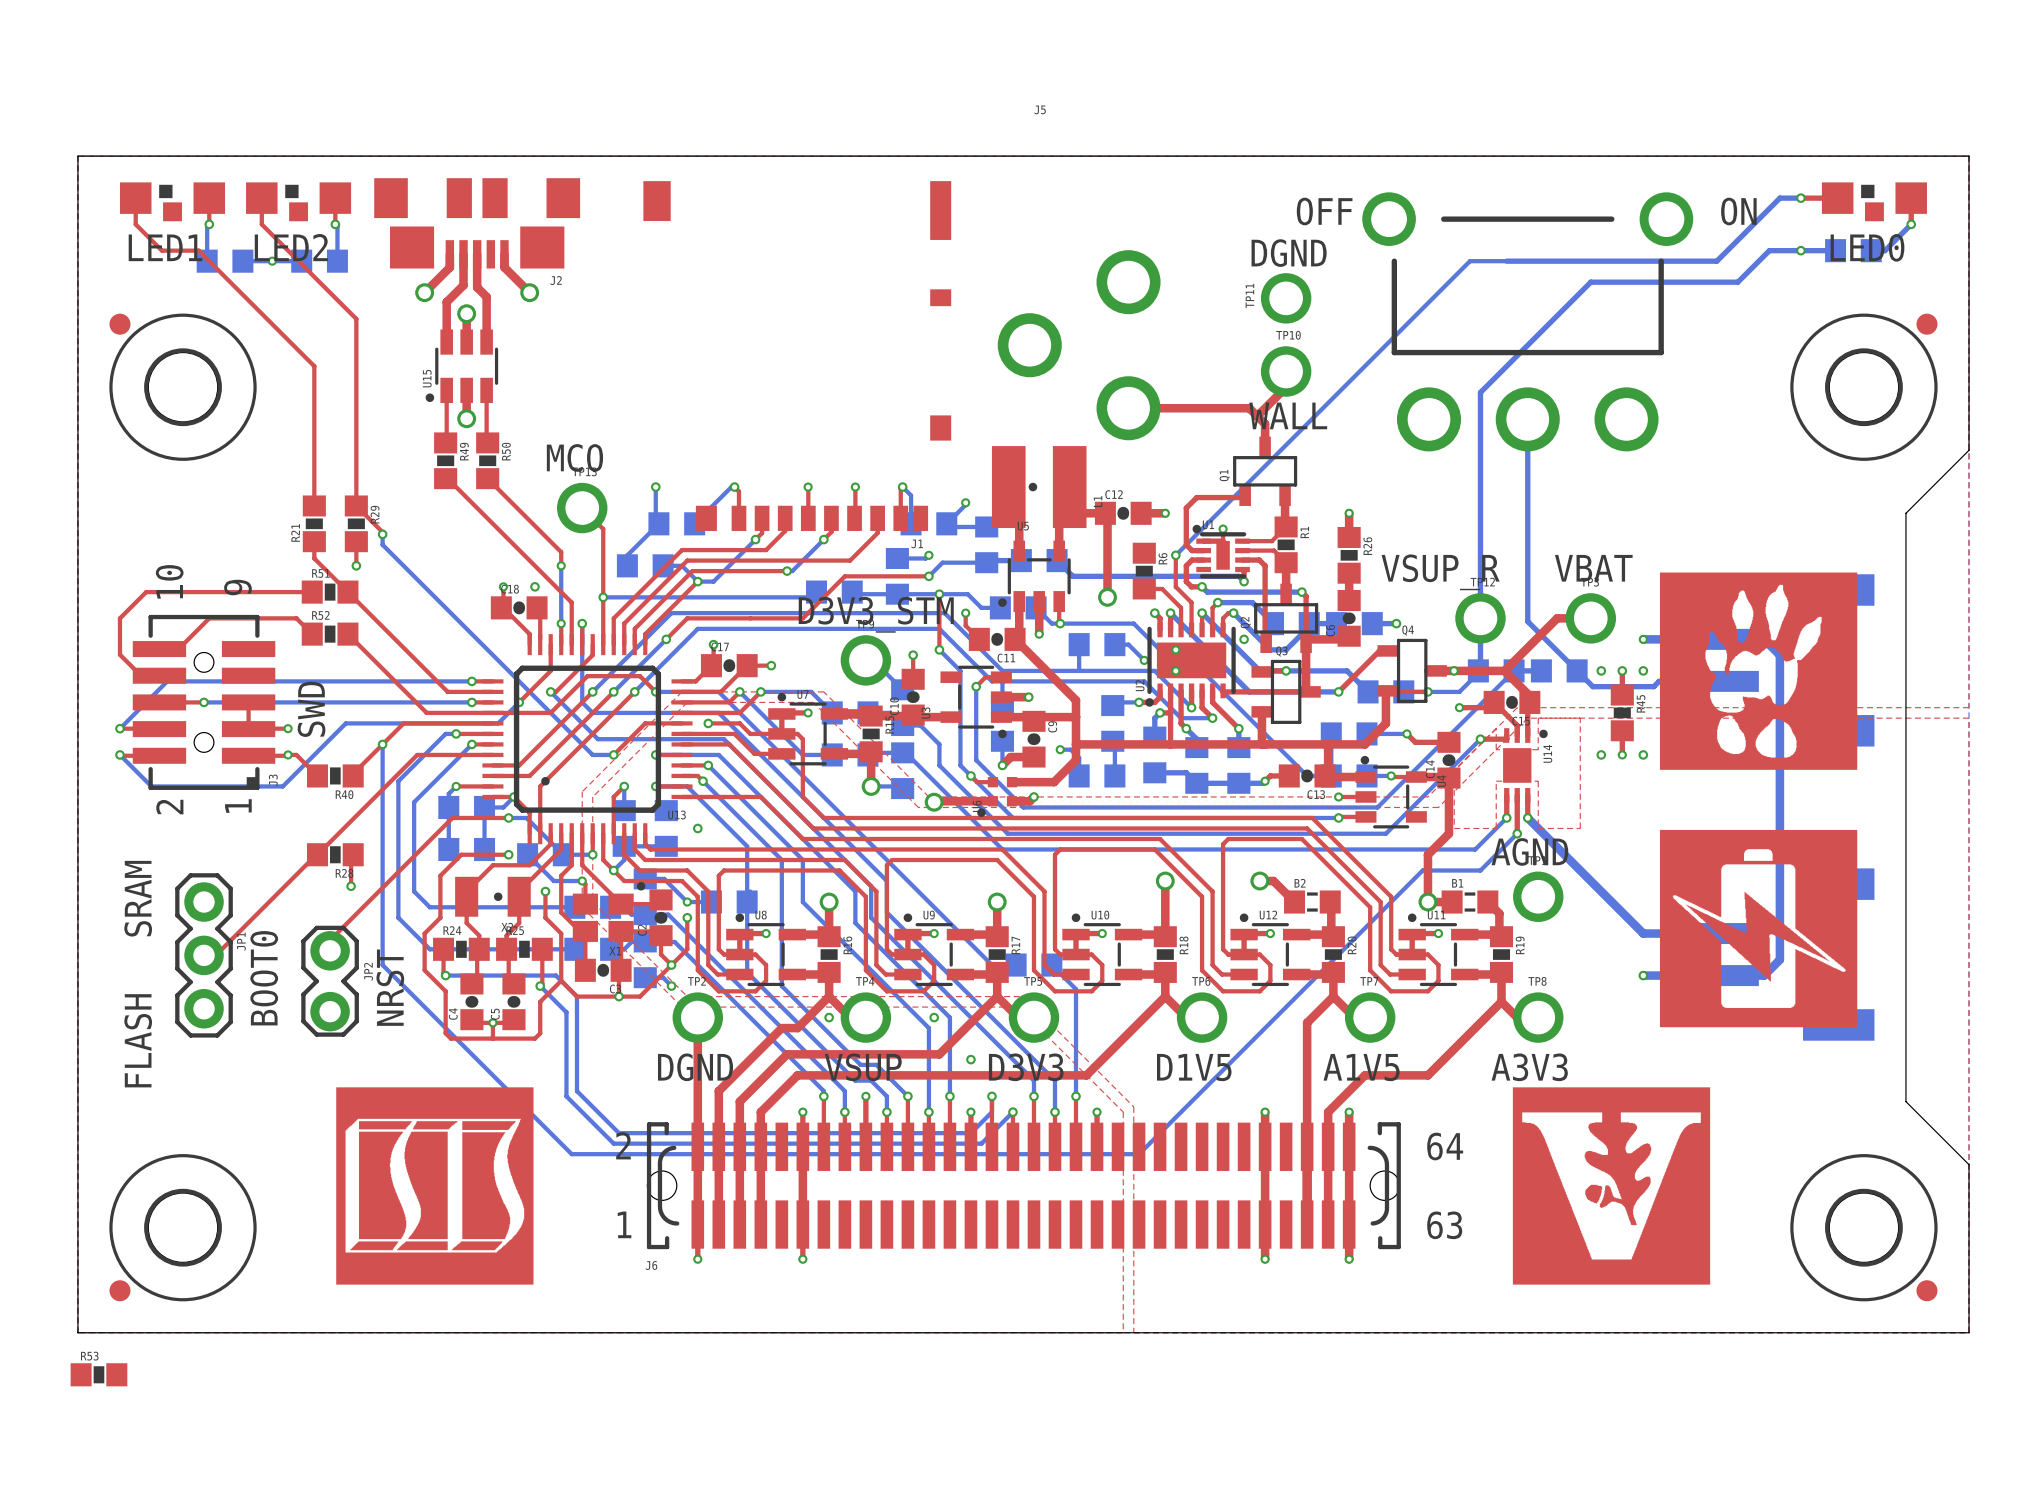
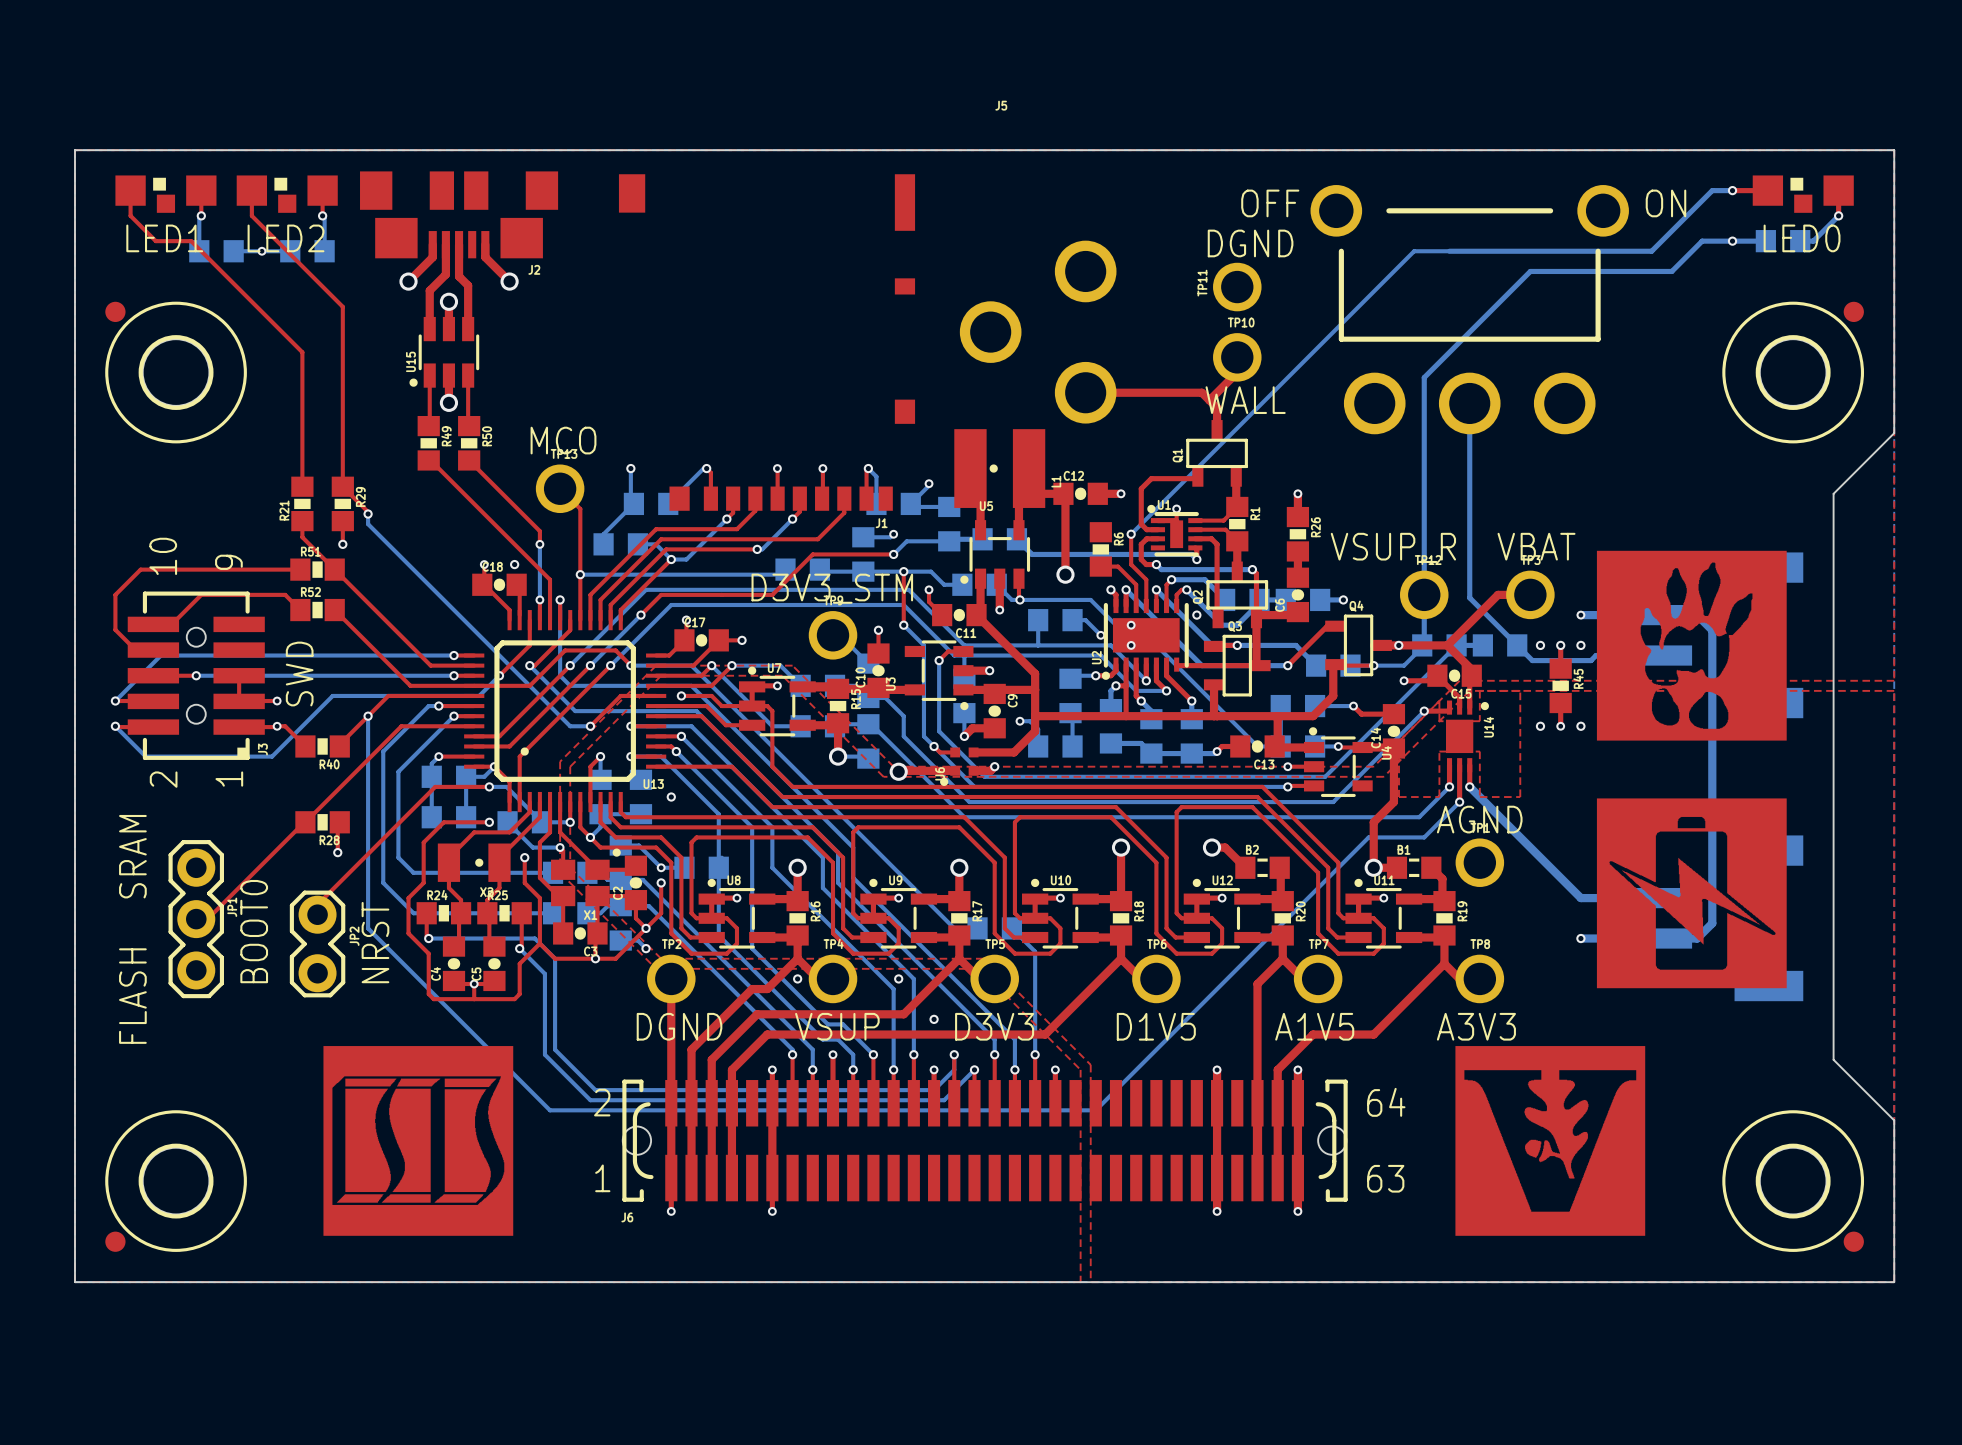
R53: (98, 1374) -> none

